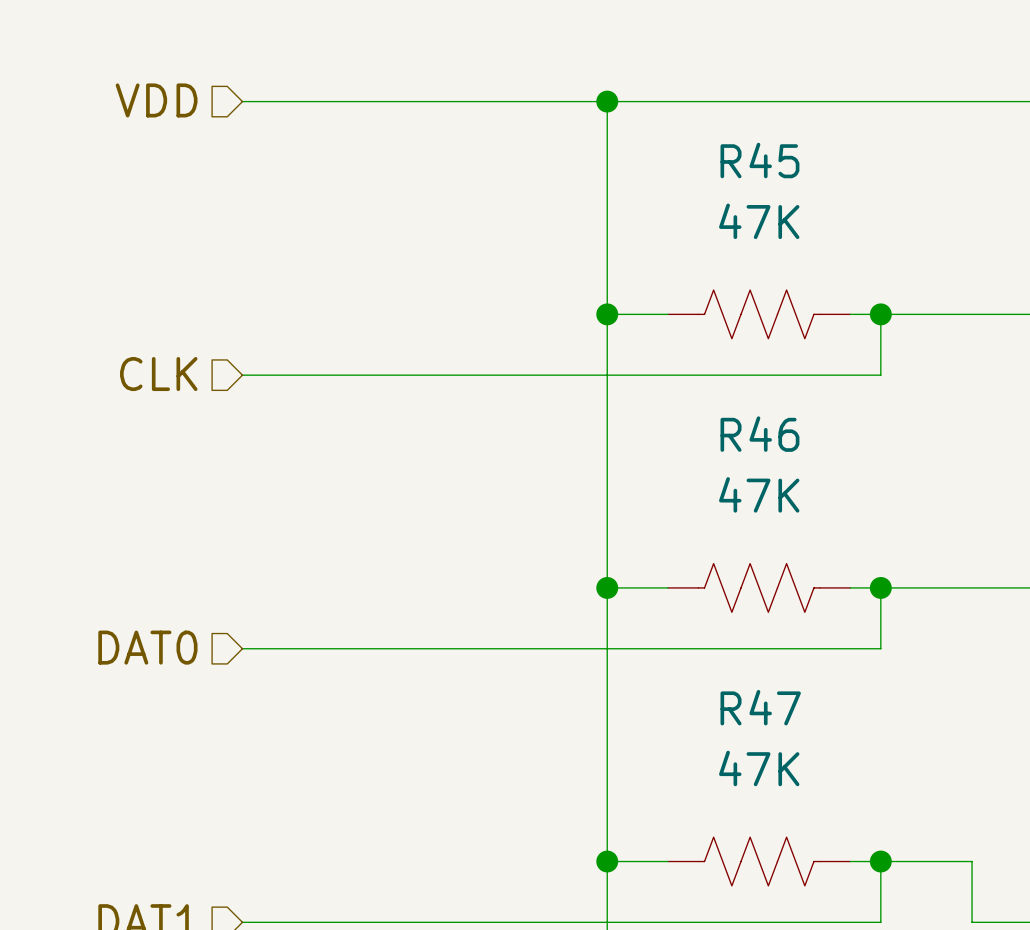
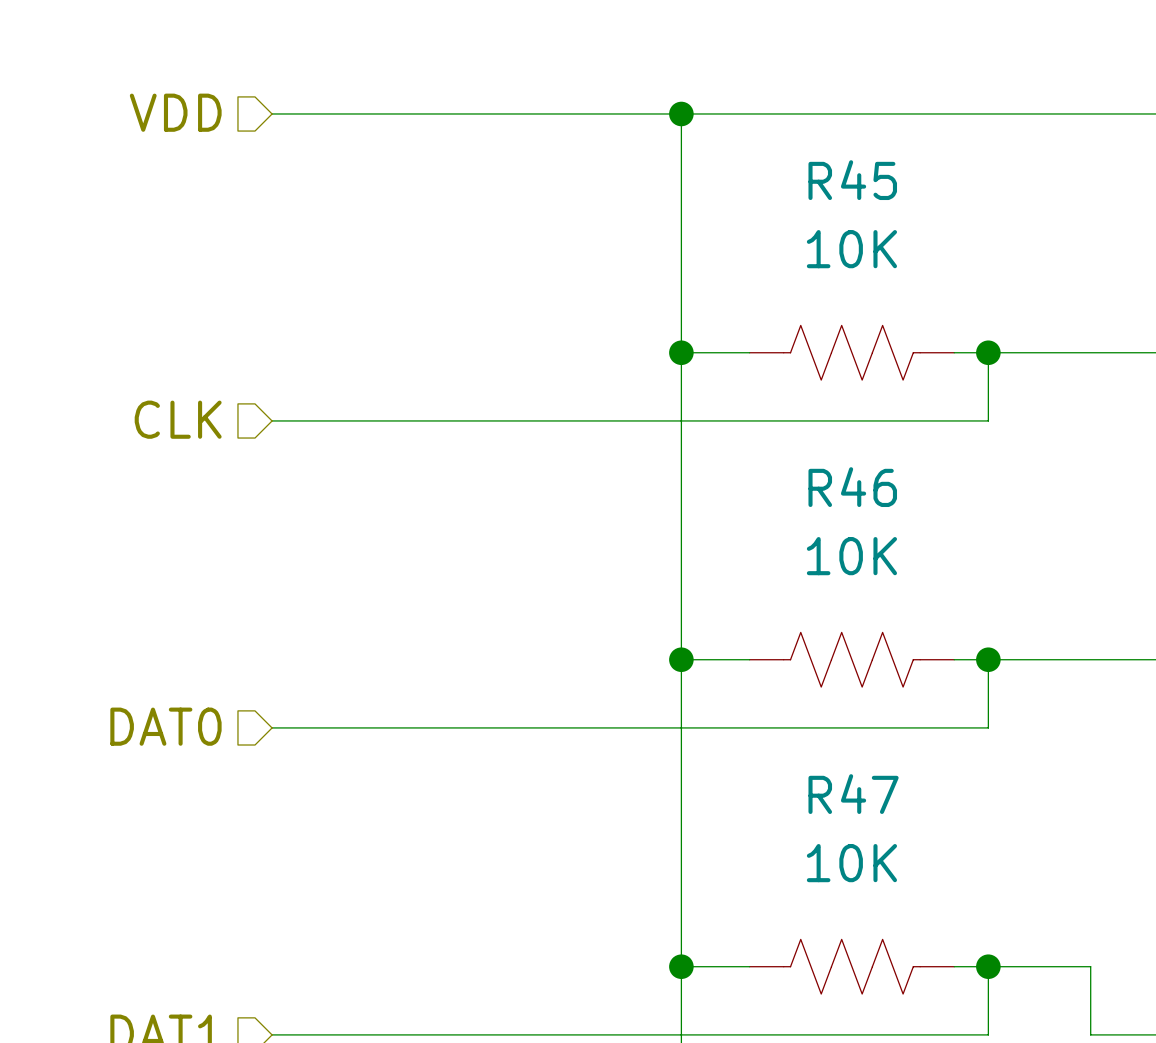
R45 value: 47K (759, 221) -> 10K (851, 249)
R46 value: 47K (759, 494) -> 10K (851, 556)
R47 value: 47K (759, 768) -> 10K (851, 863)

